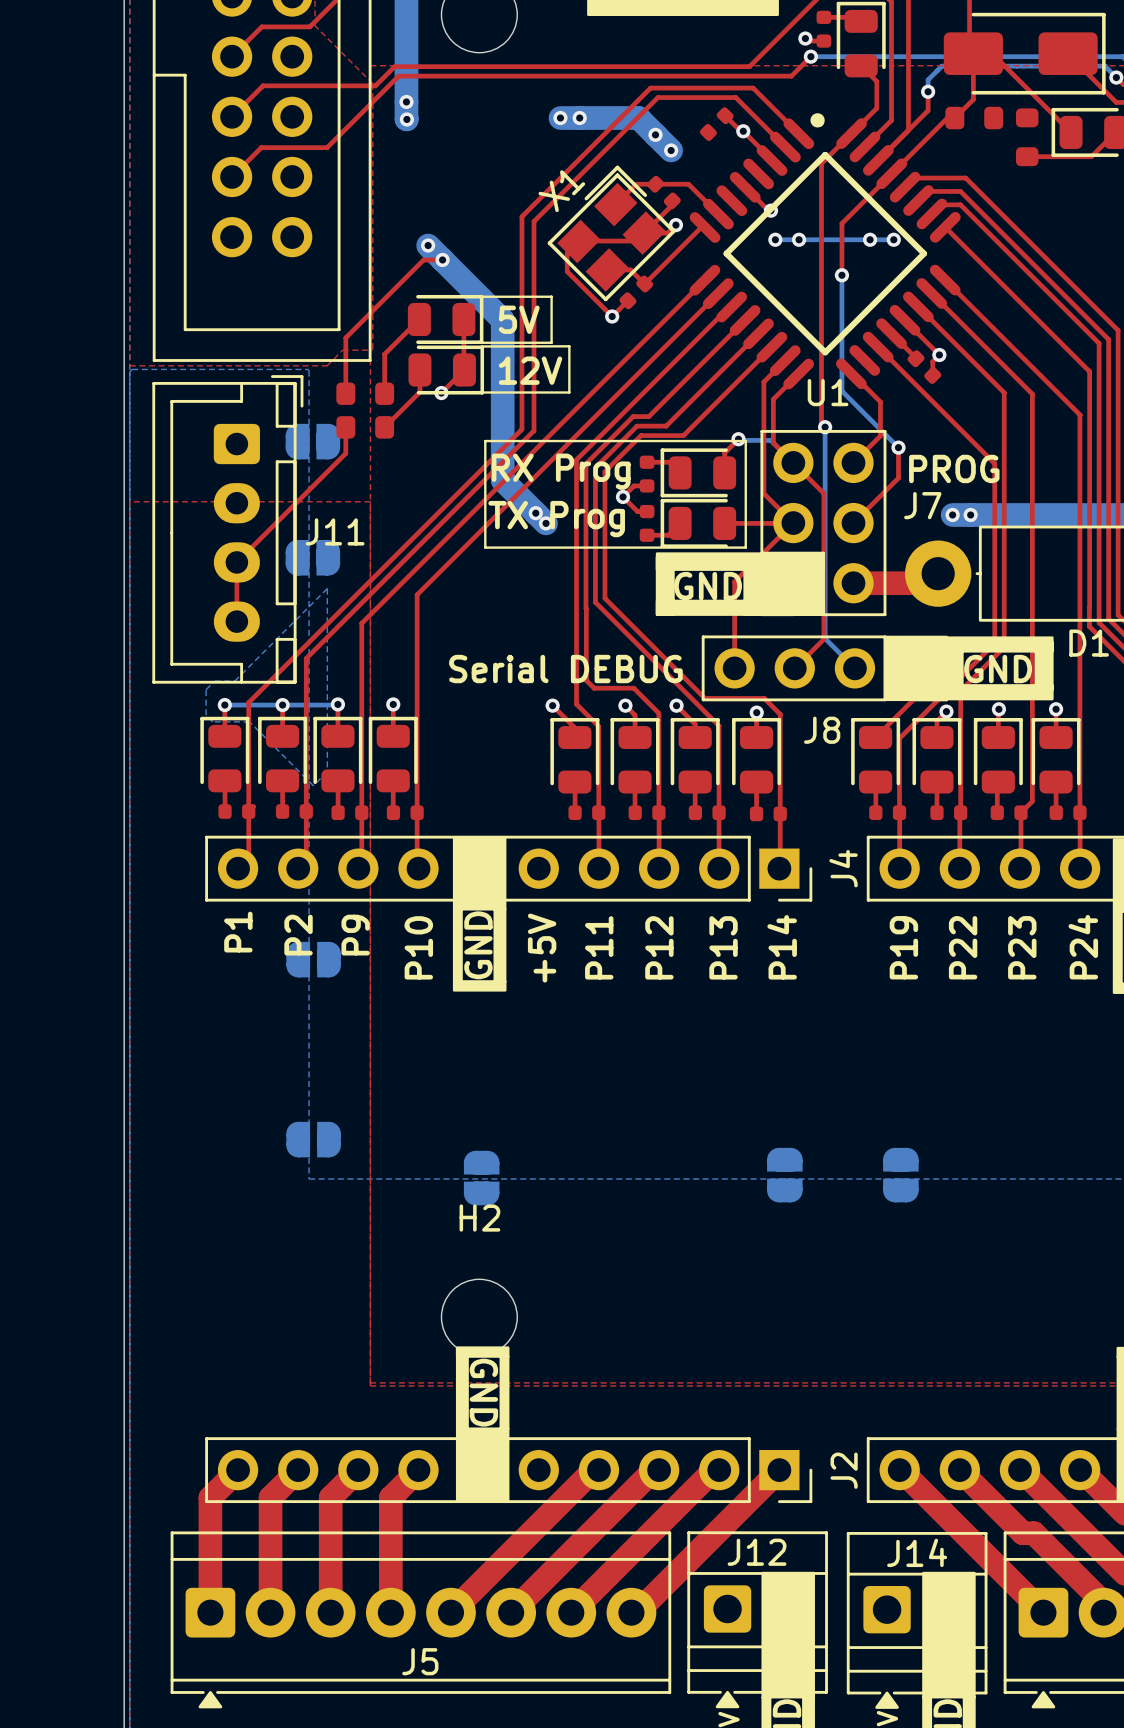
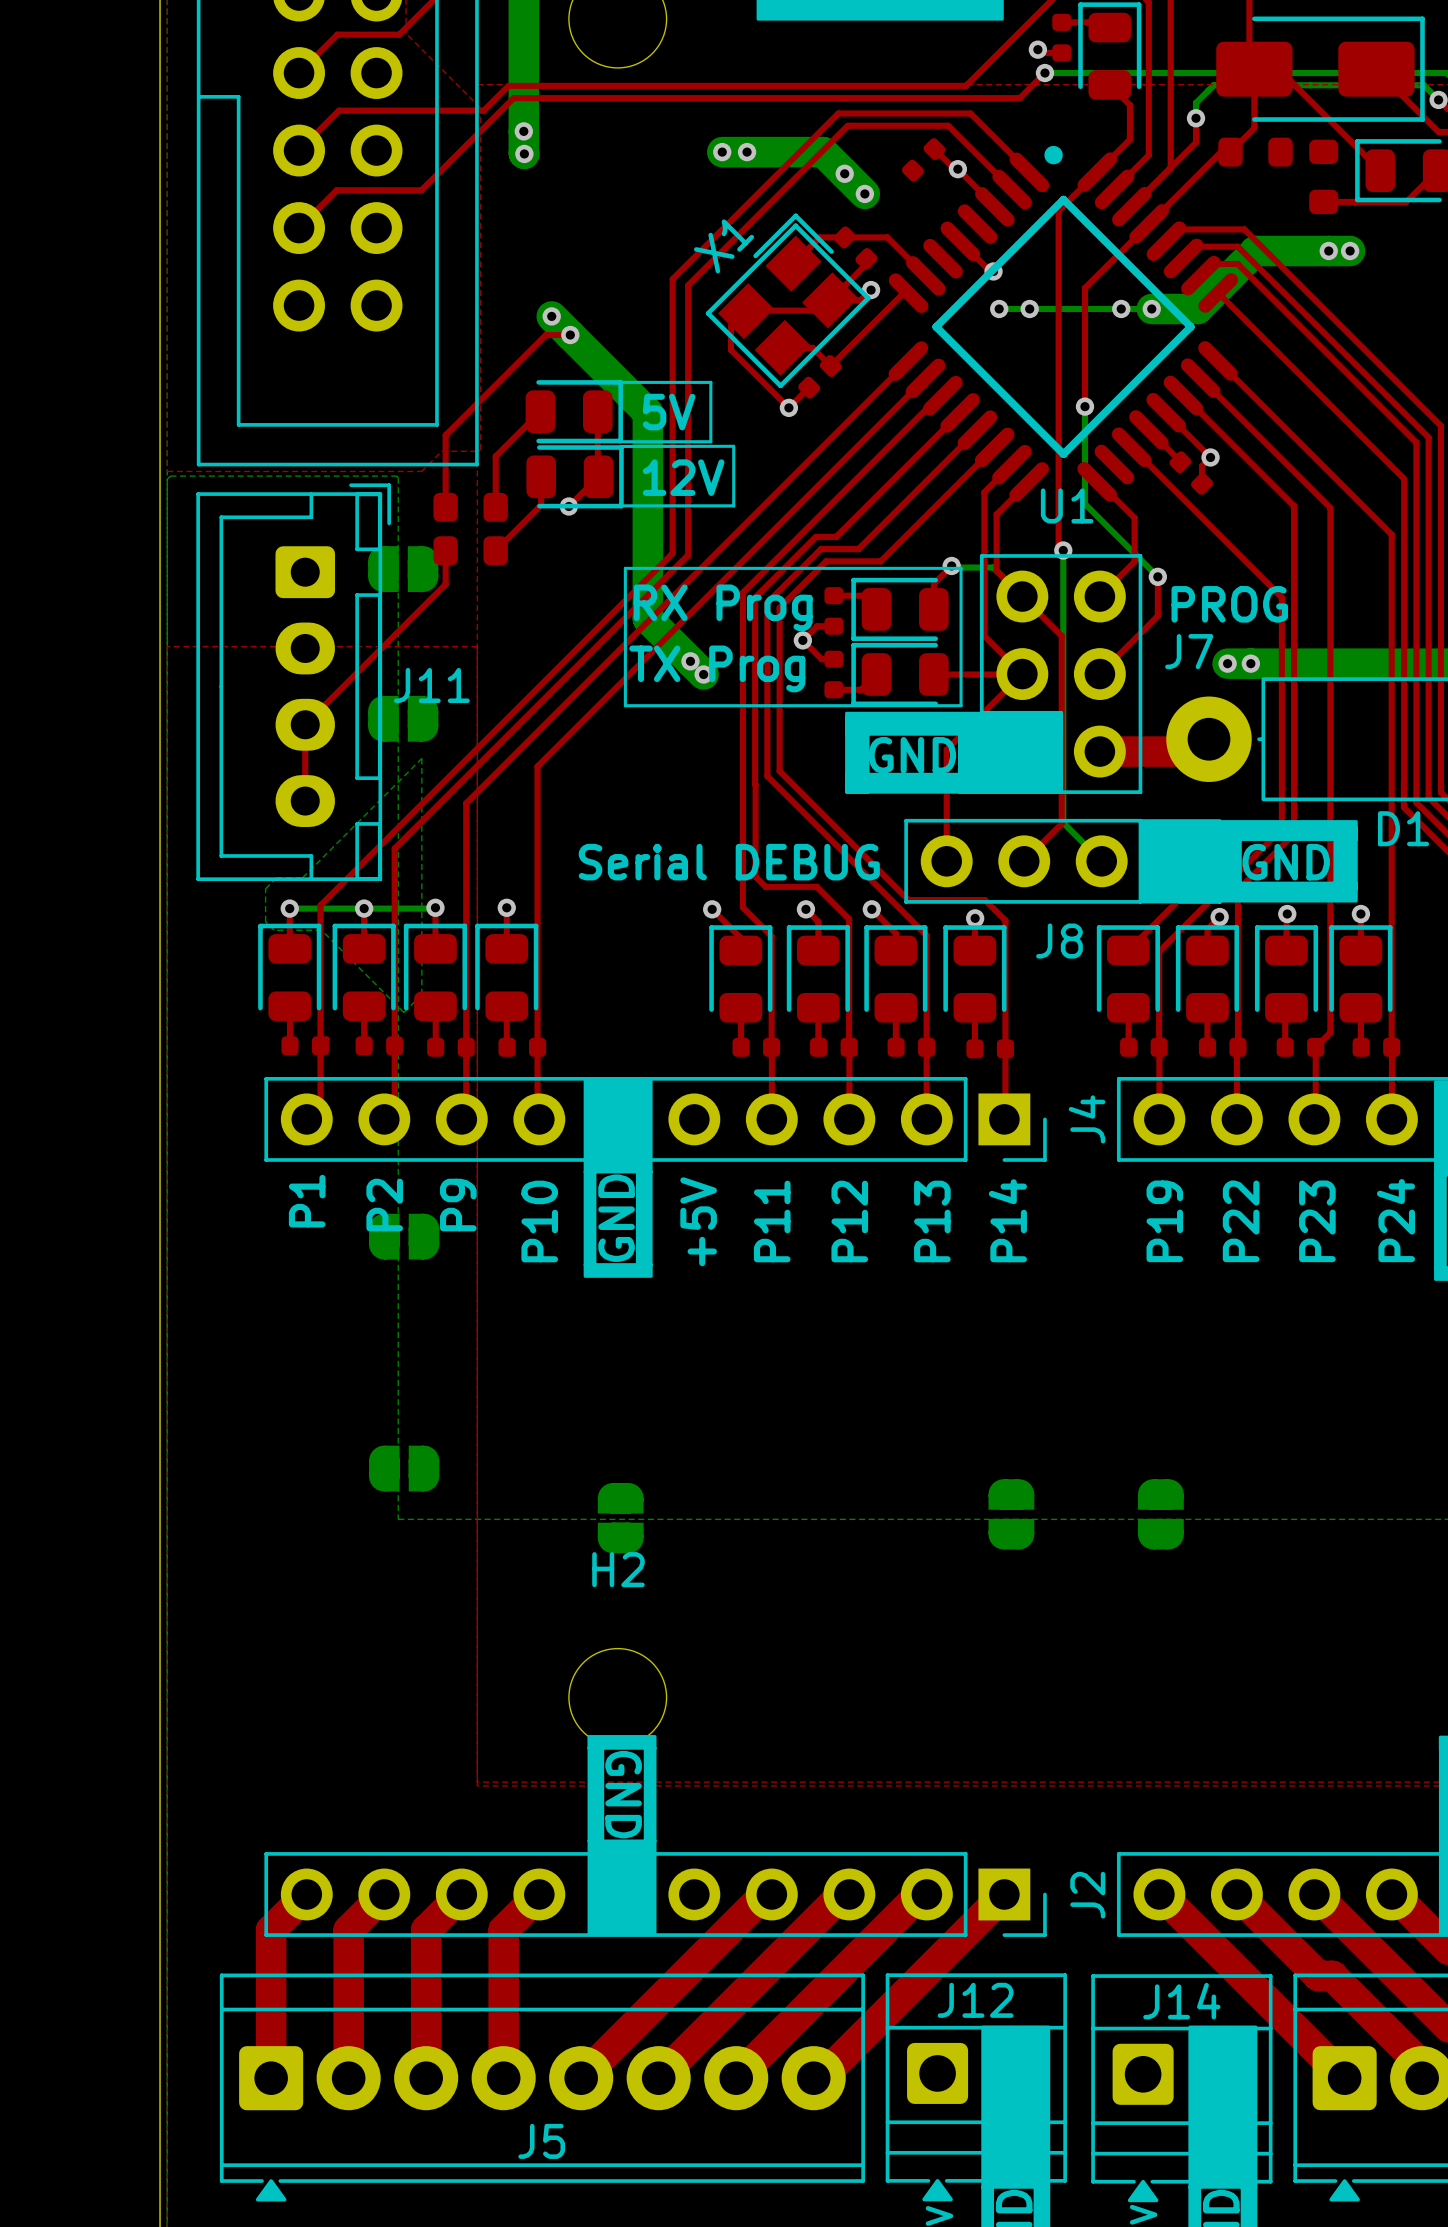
via: none -> (1328, 251)
bottom track: none -> (1350, 251) (1255, 251) (1197, 308) (1151, 308)
via: none -> (1350, 251)
top track: none -> (1084, 354) (1084, 406)
bottom track: (841, 275) (841, 315) -> none
via position: (841, 275) -> (1084, 406)

